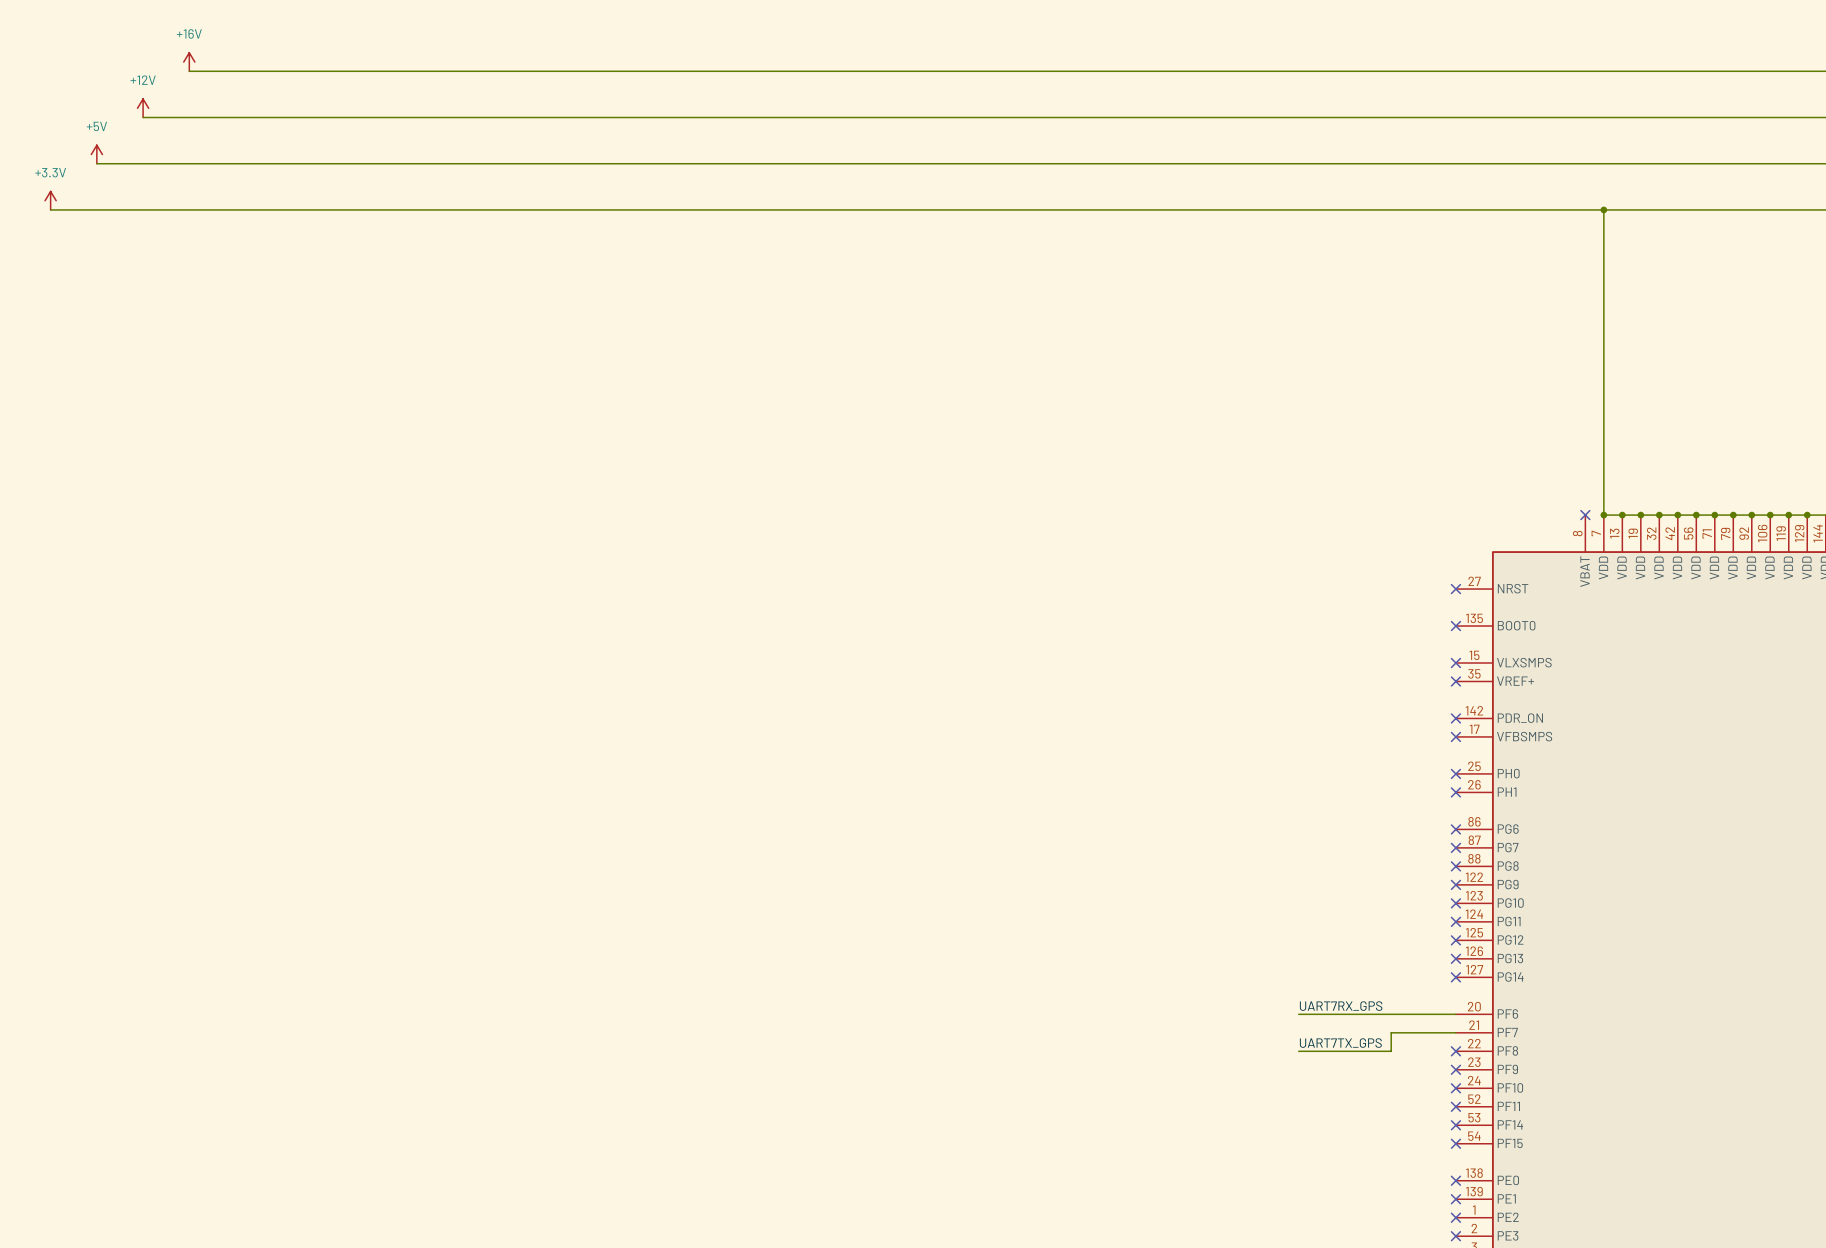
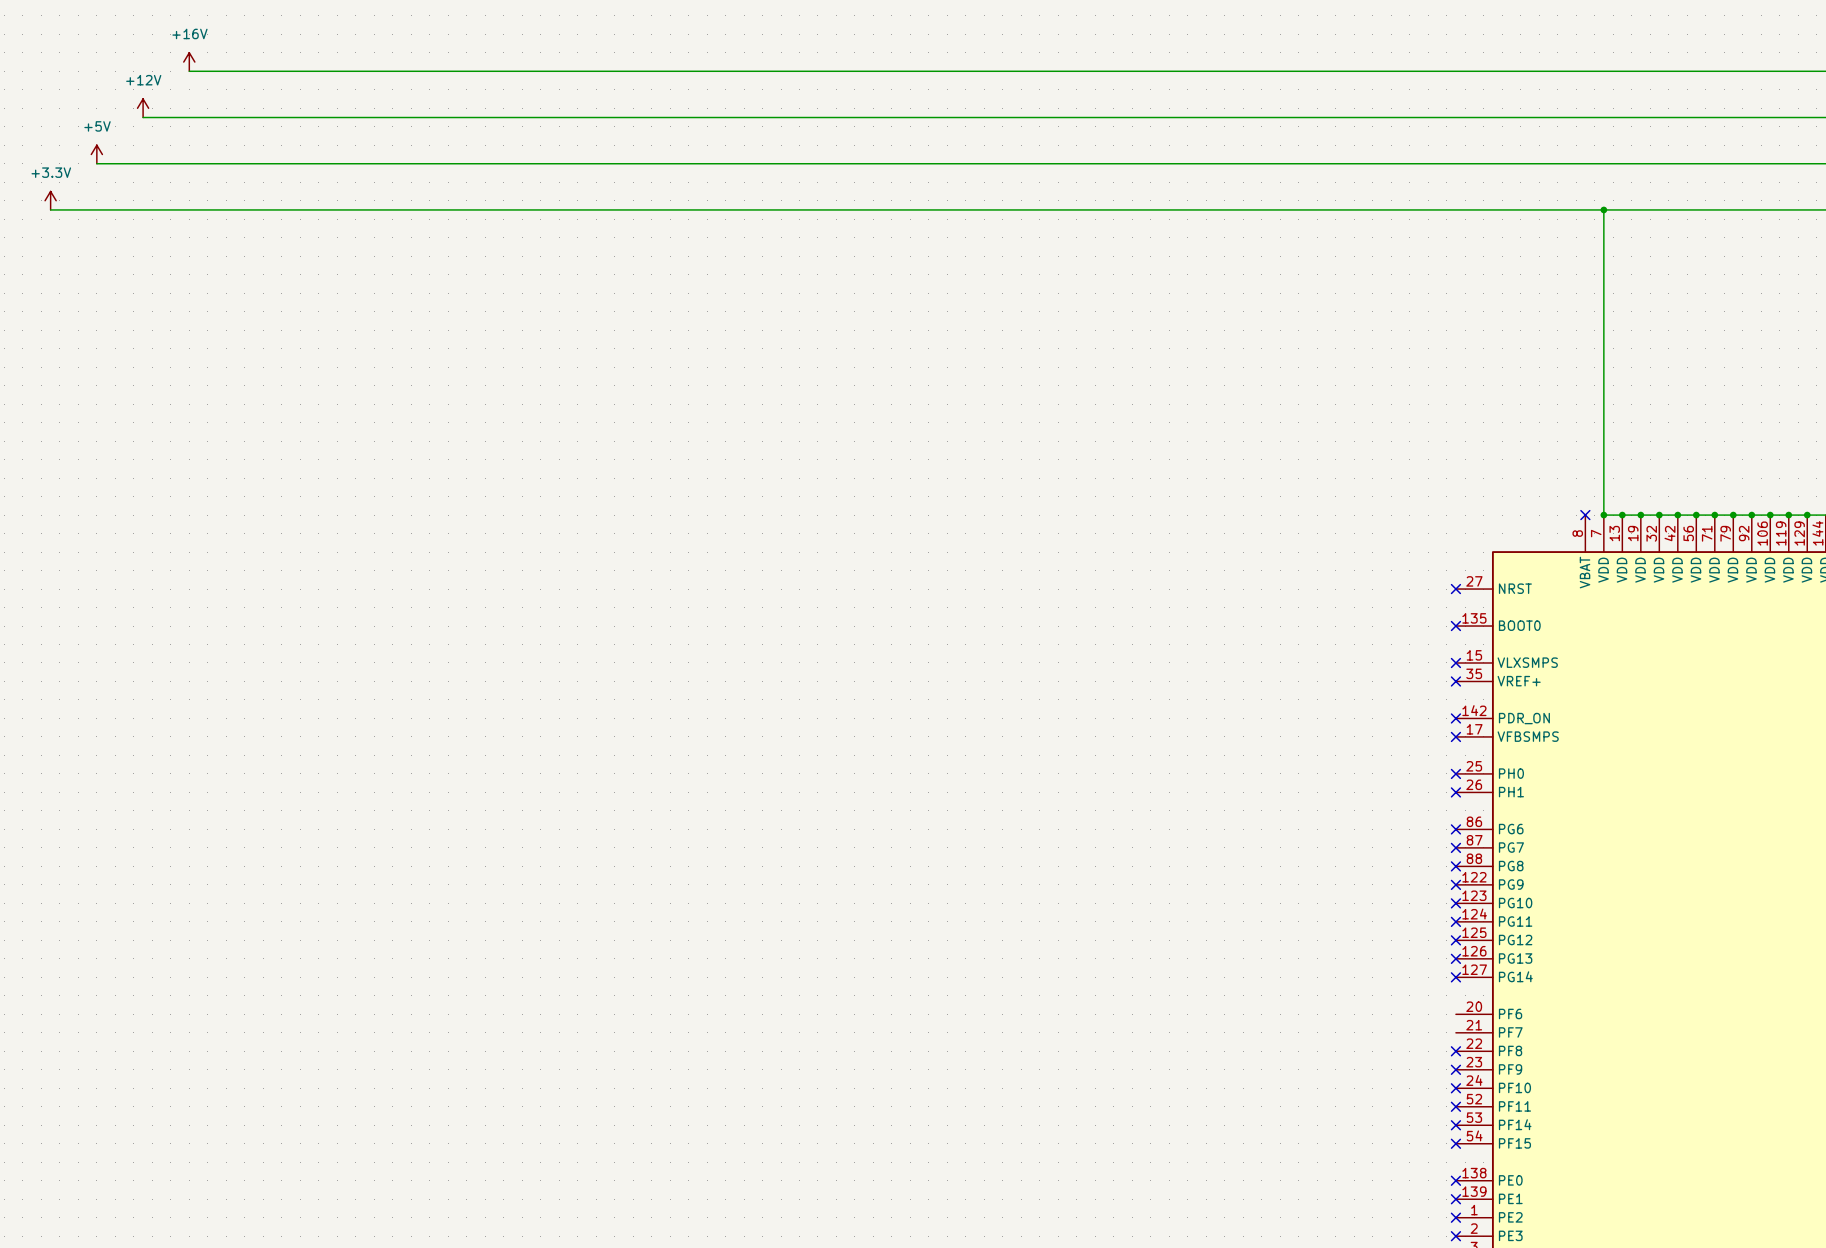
label: UART7RX_GPS (1341, 1006) -> none
wire: (1298, 1014) (1455, 1014) -> none
wire: (1455, 1032) (1391, 1032) (1391, 1051) (1298, 1051) -> none
label: UART7TX_GPS (1340, 1043) -> none

